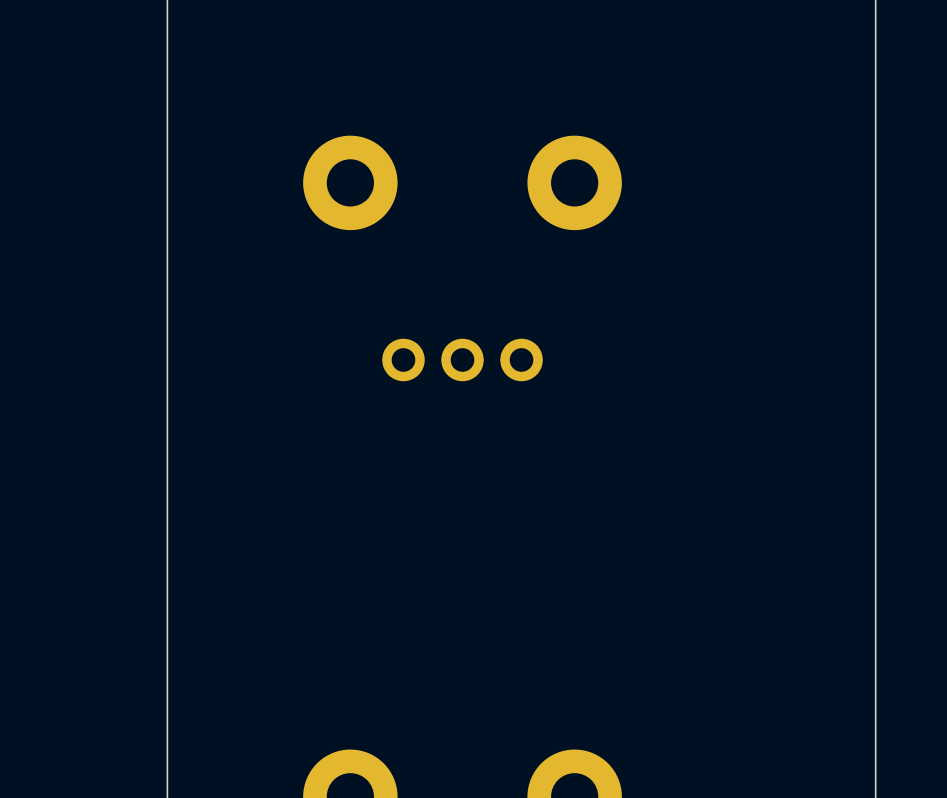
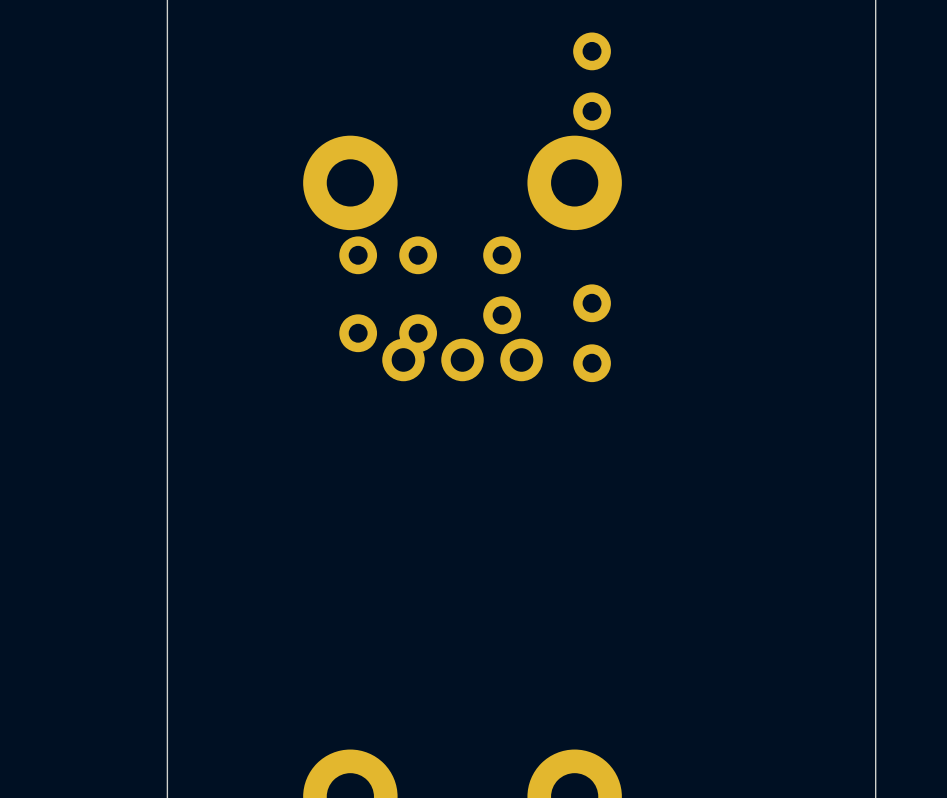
part: none -> (592, 81)
part: none -> (388, 255)
part: none -> (502, 285)
part: none -> (388, 333)
part: none -> (592, 333)

